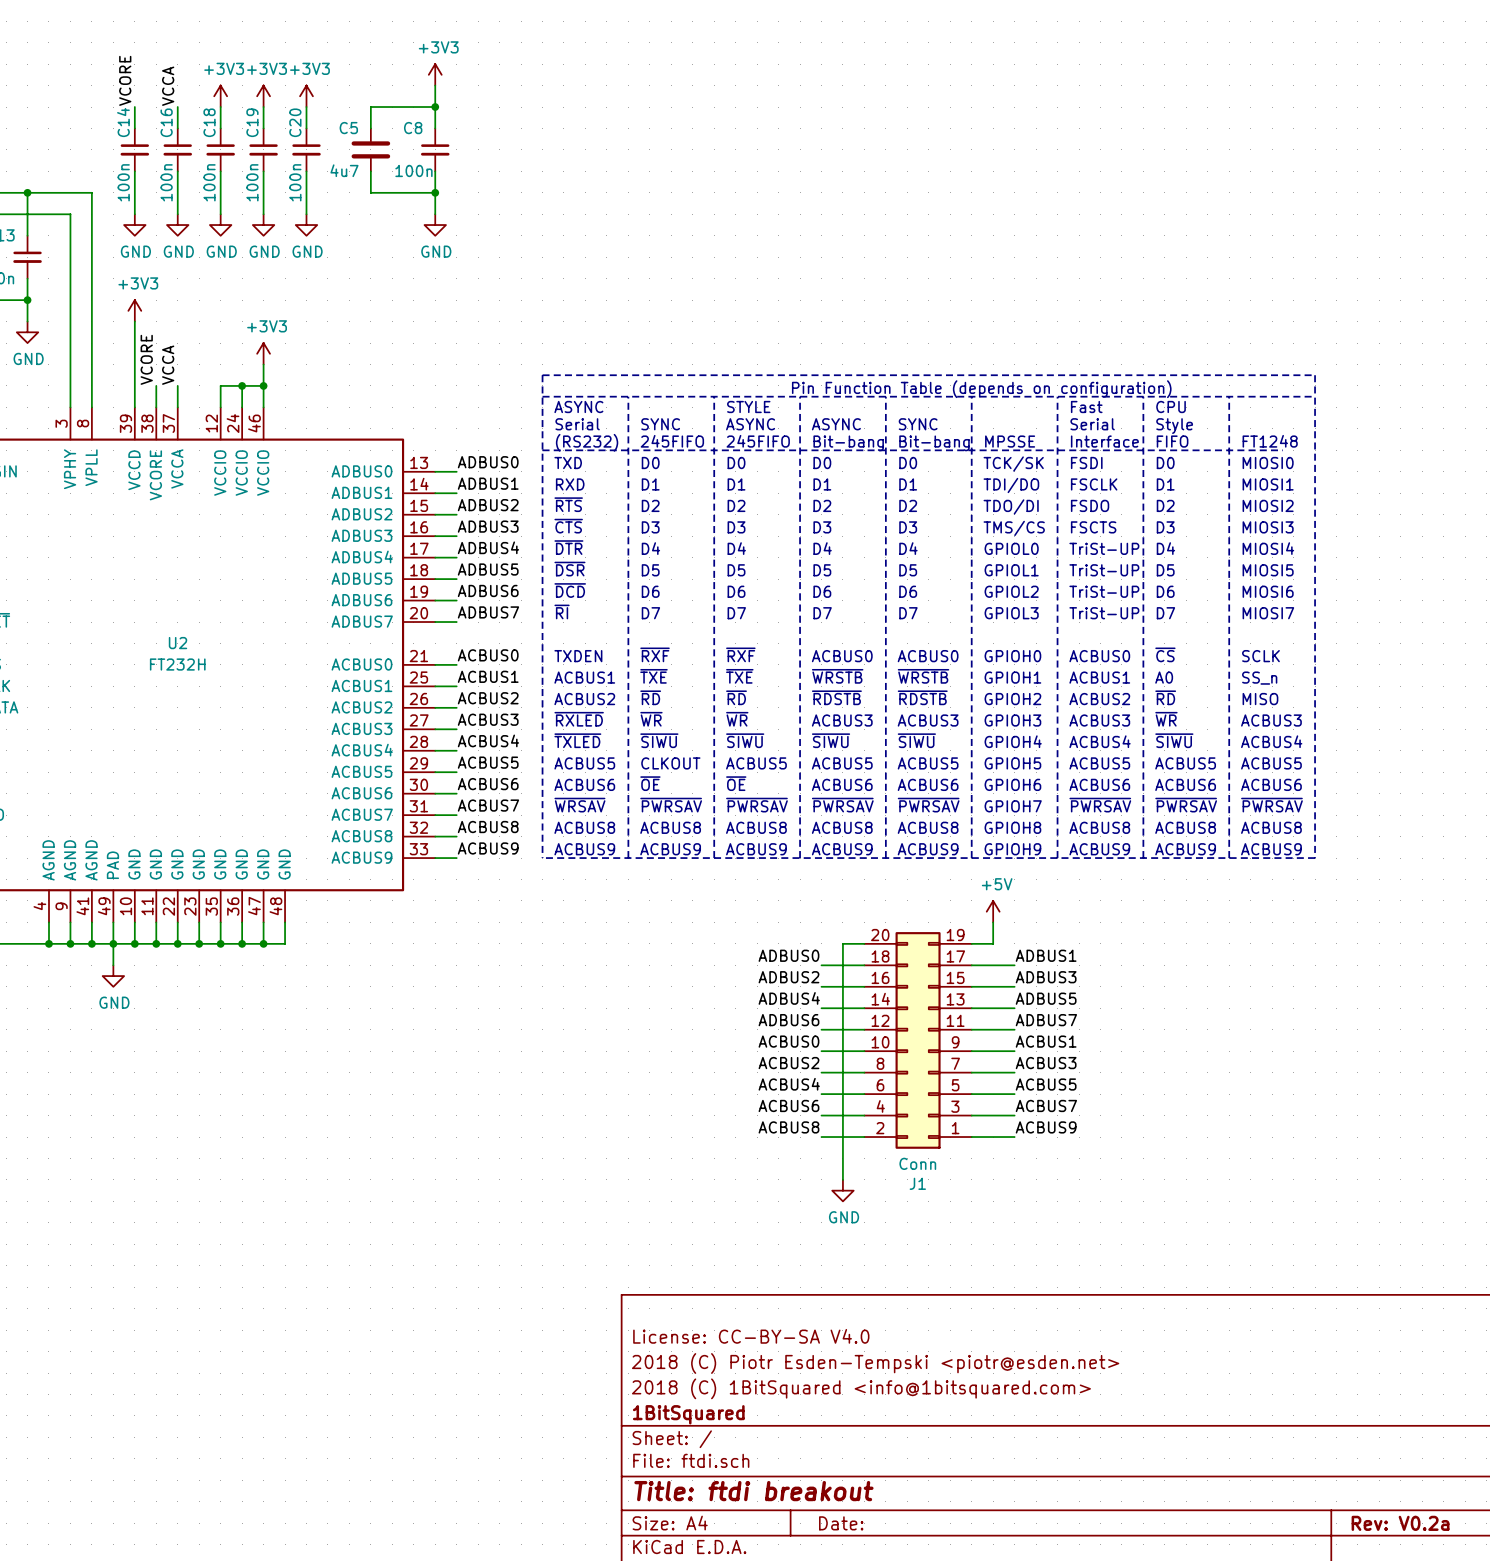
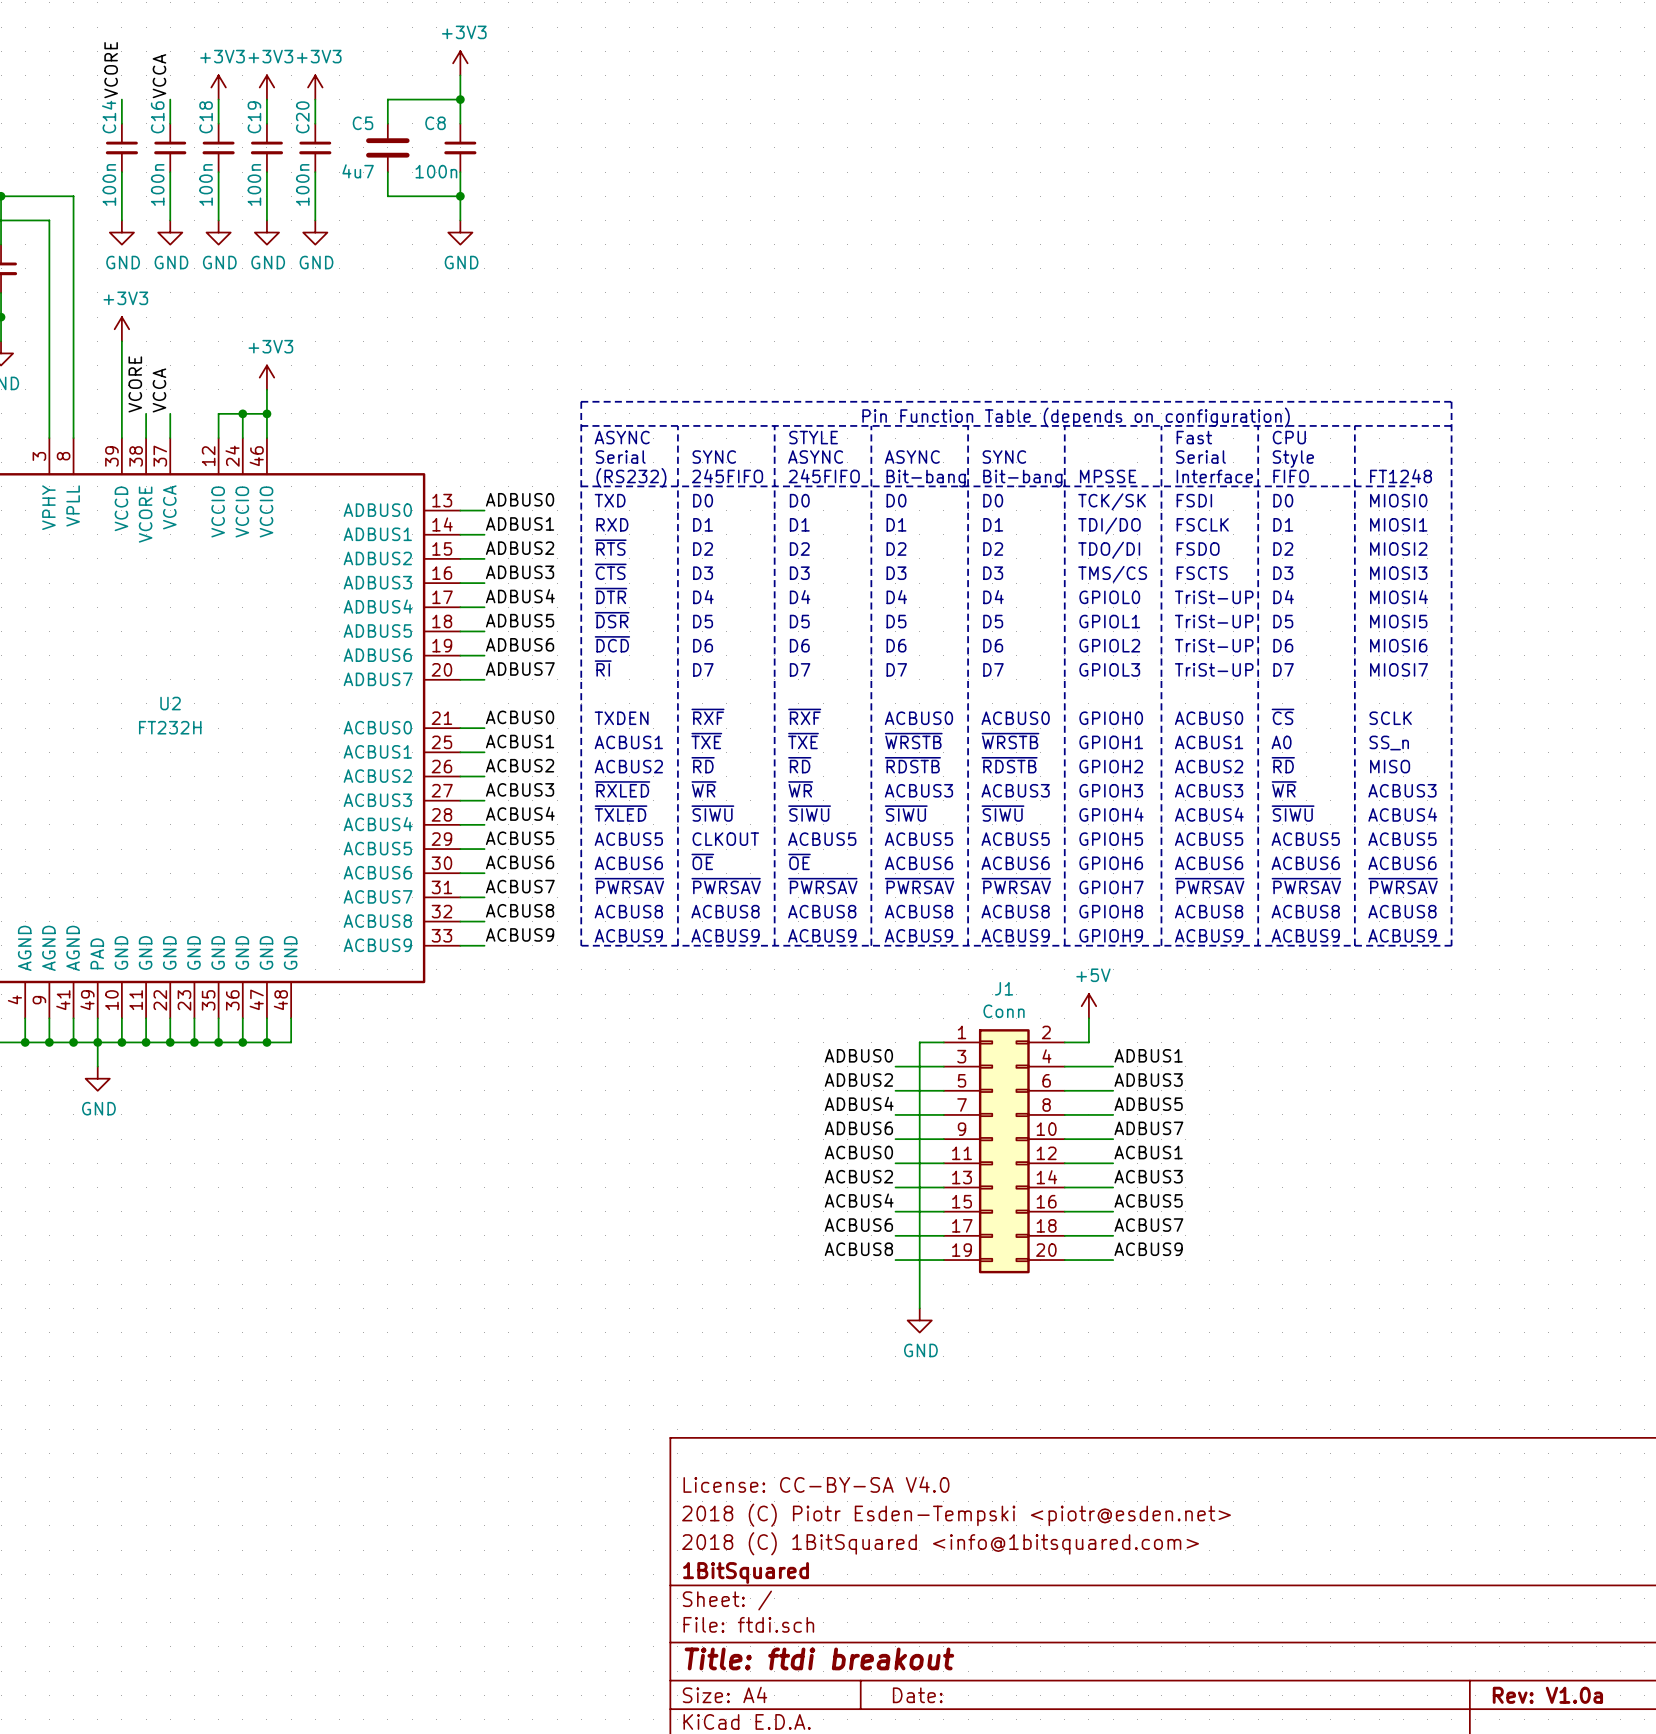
text: ~{WRSAV} (579, 805) -> ~{PWRSAV} (629, 886)
J1 rotation: 0° (918, 1040) -> 180° (1004, 1151)
title block: Rev: V0.2a (1400, 1523) -> Rev: V1.0a (1547, 1695)

